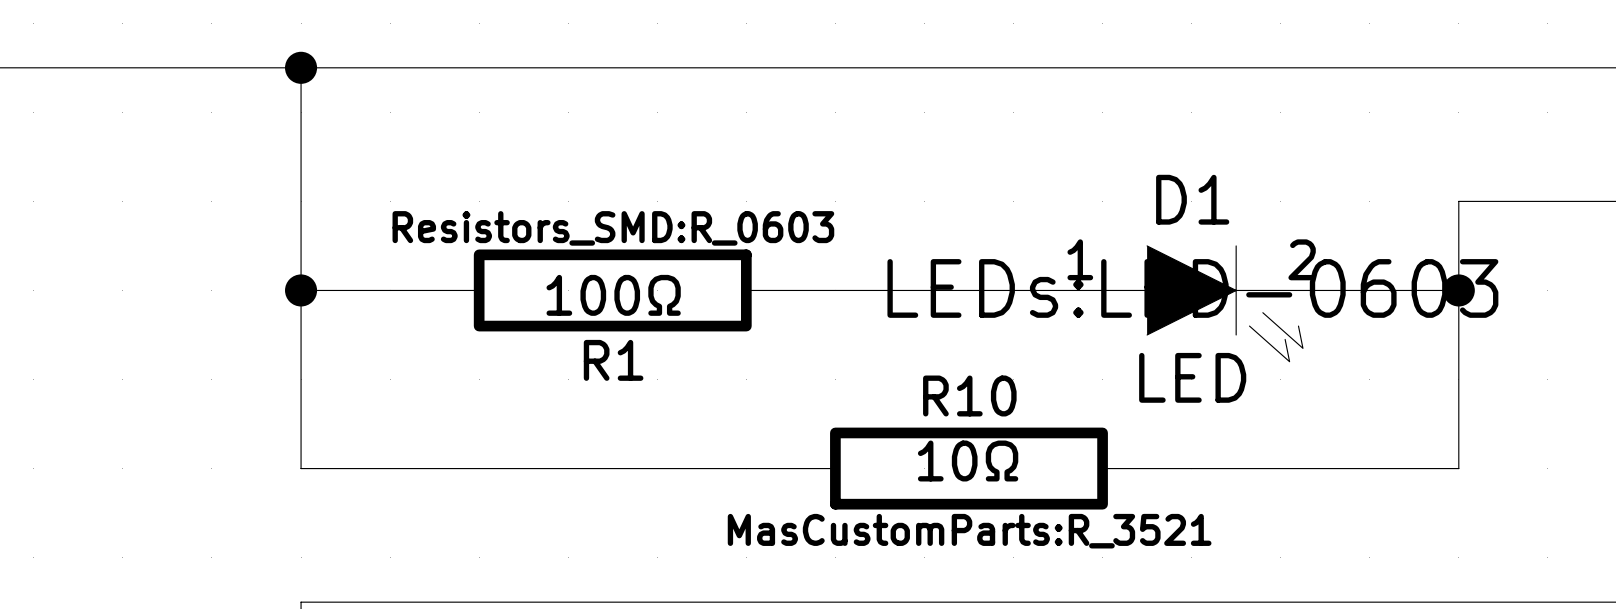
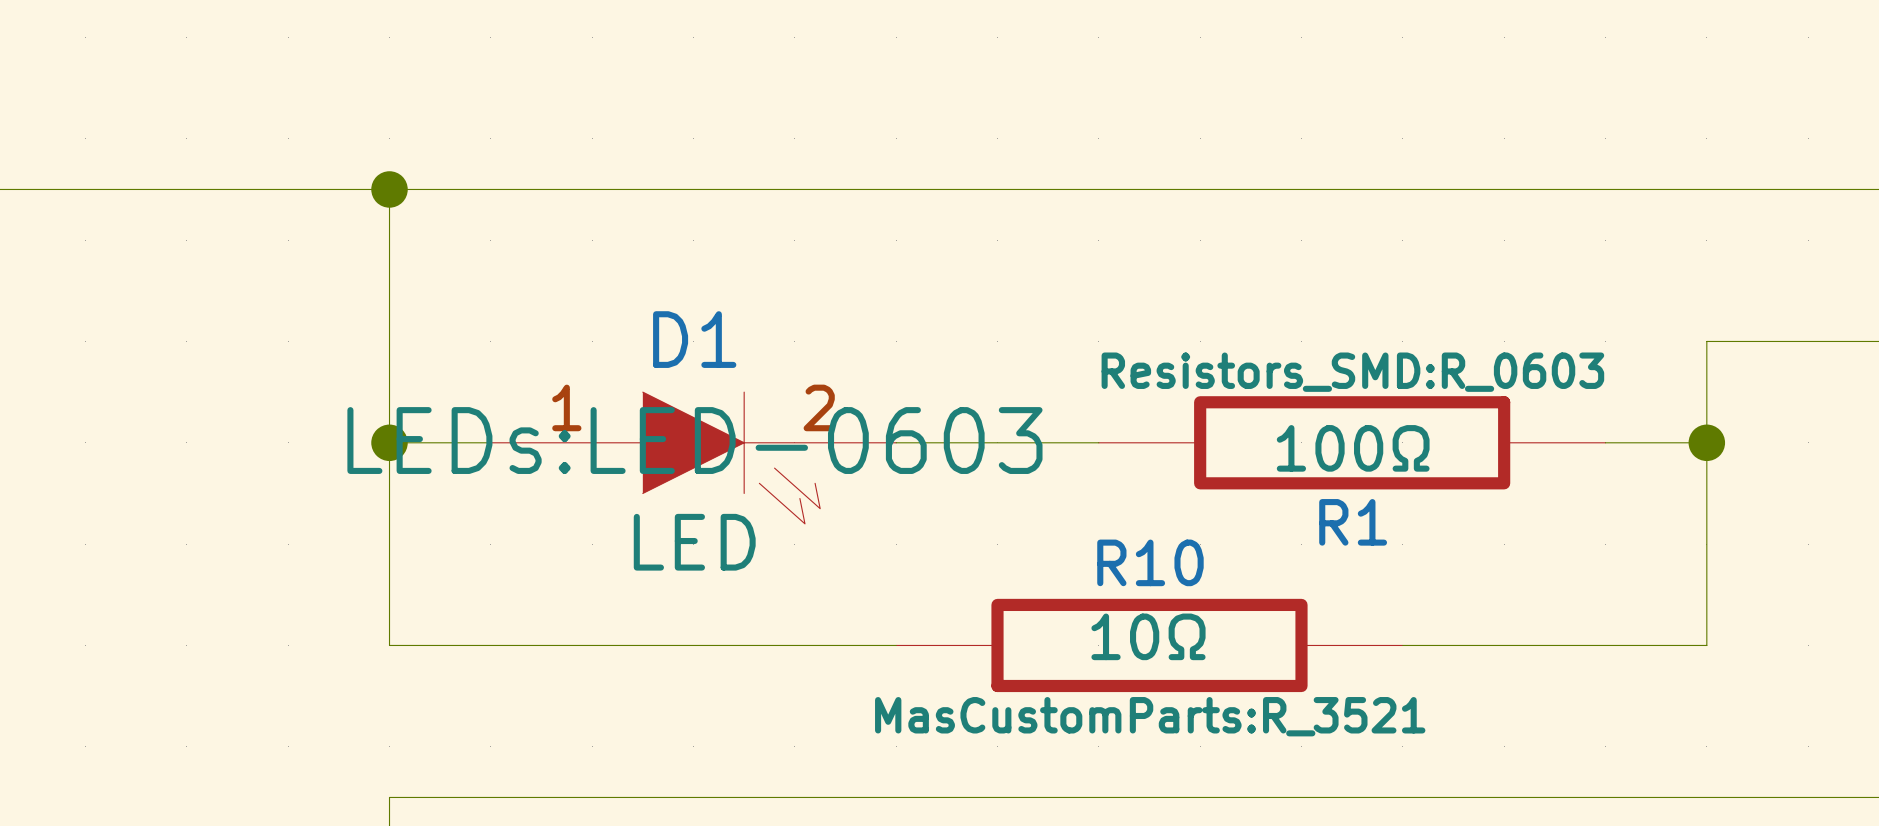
R1 position: (612, 290) -> (1352, 442)
D1 position: (1191, 303) -> (693, 458)

